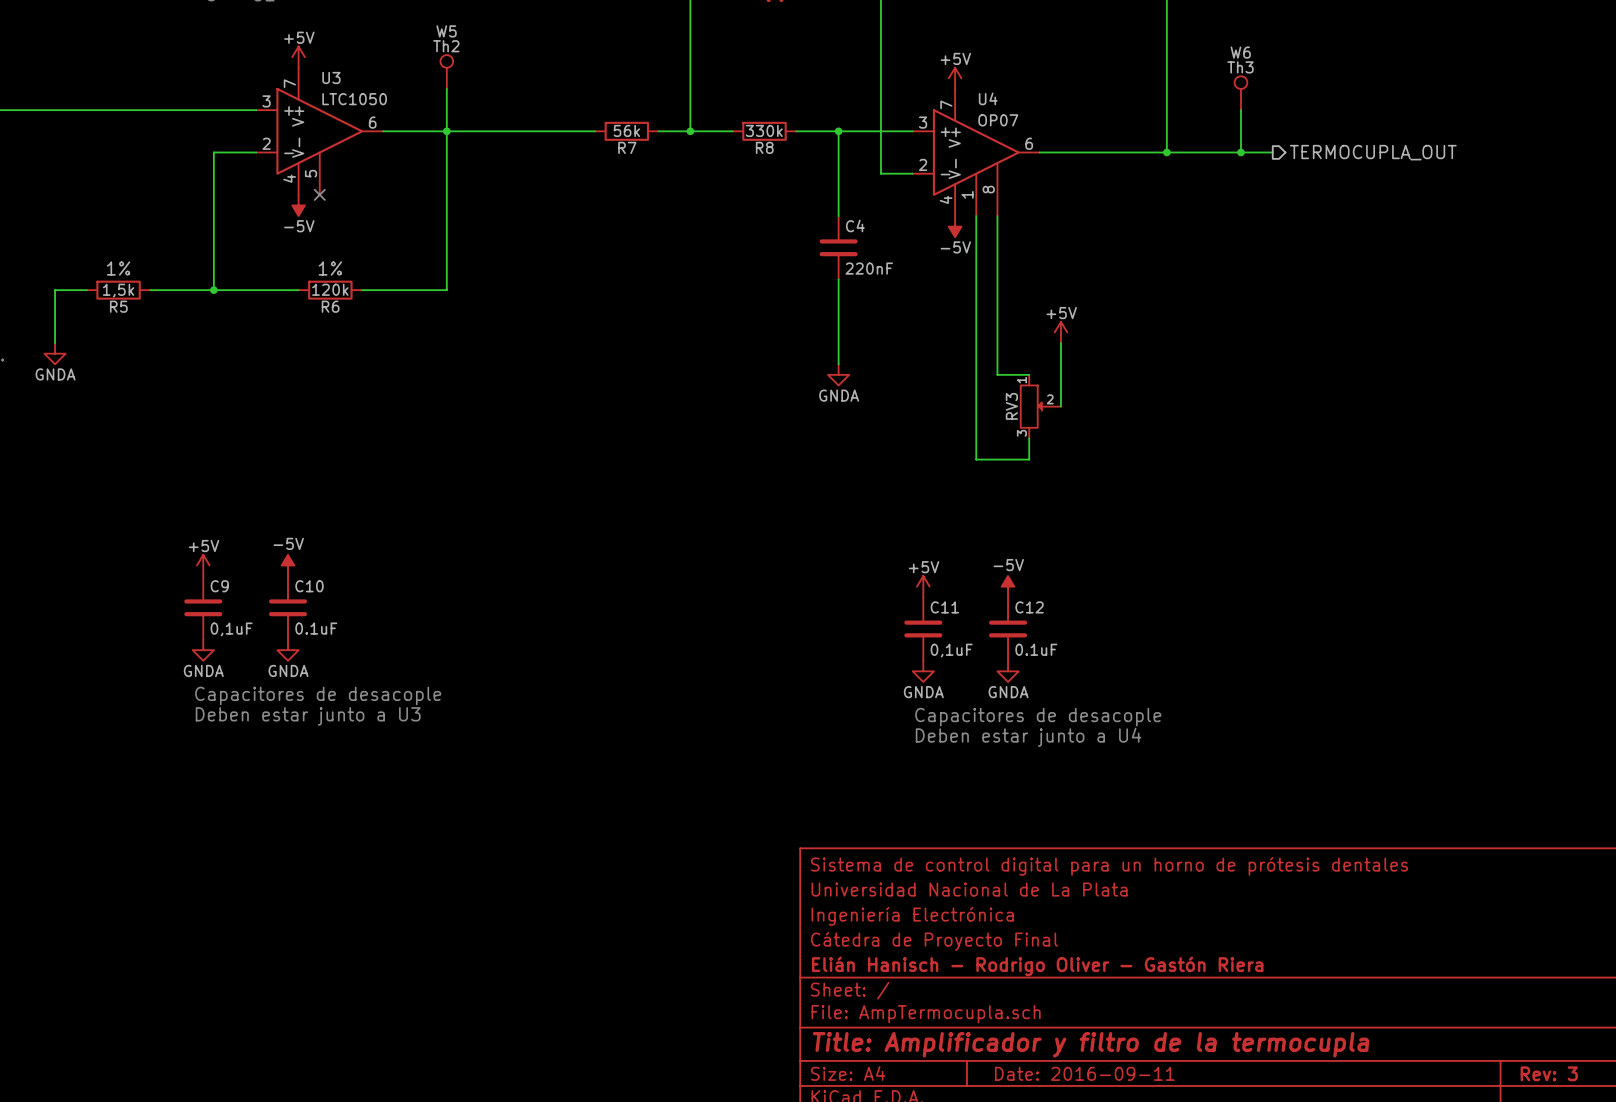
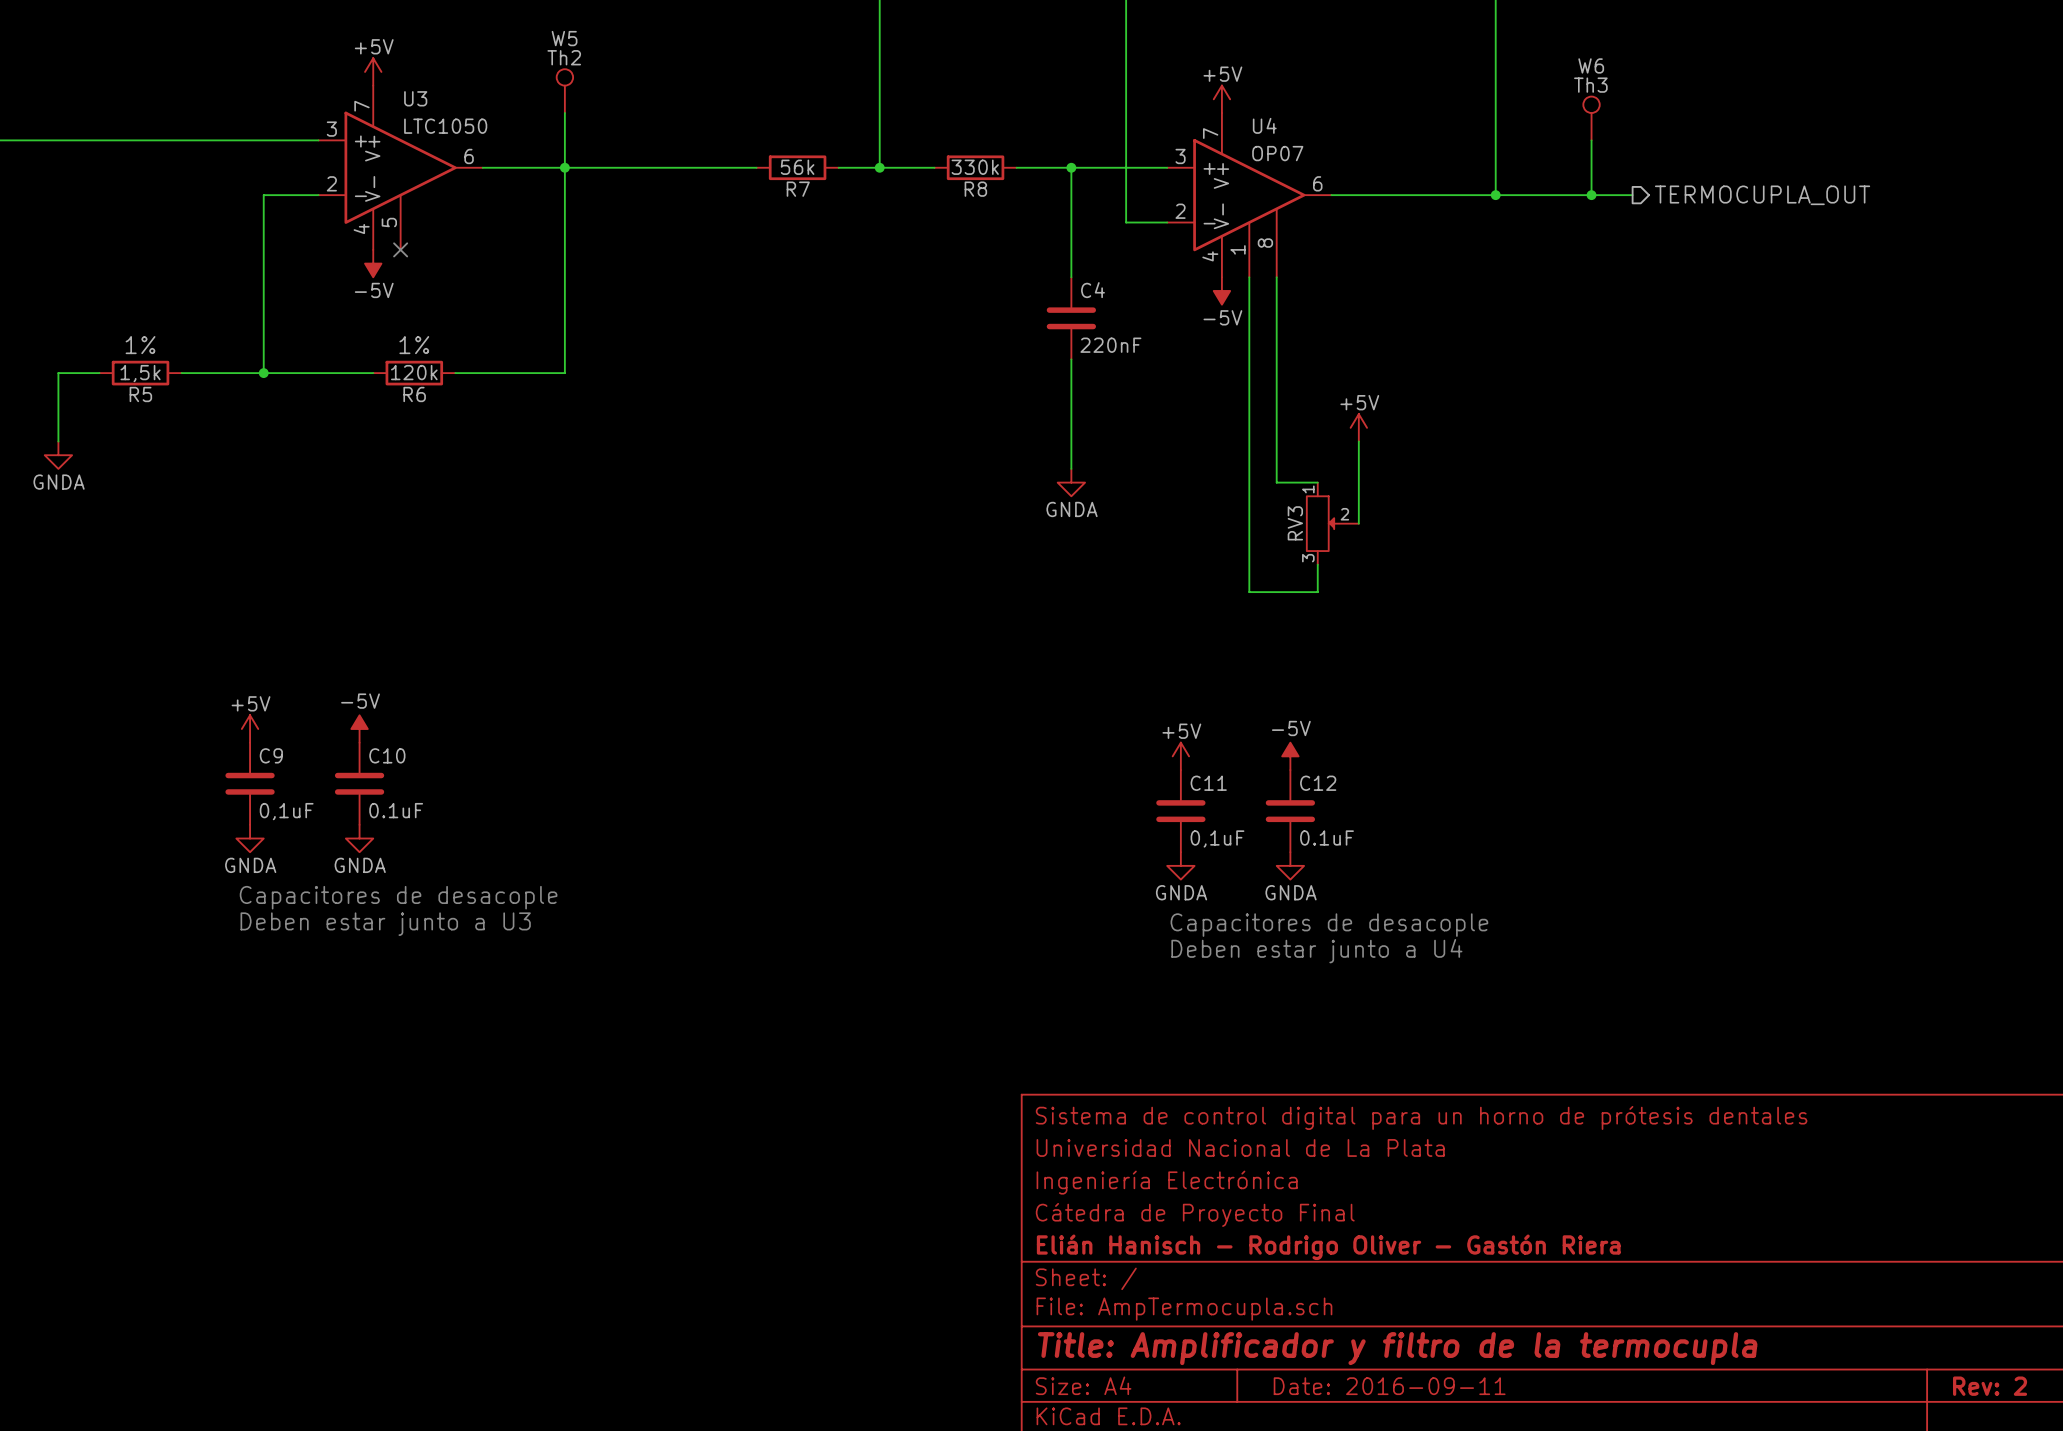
title block: Rev: 3 (1549, 1073) -> Rev: 2 (1990, 1386)

